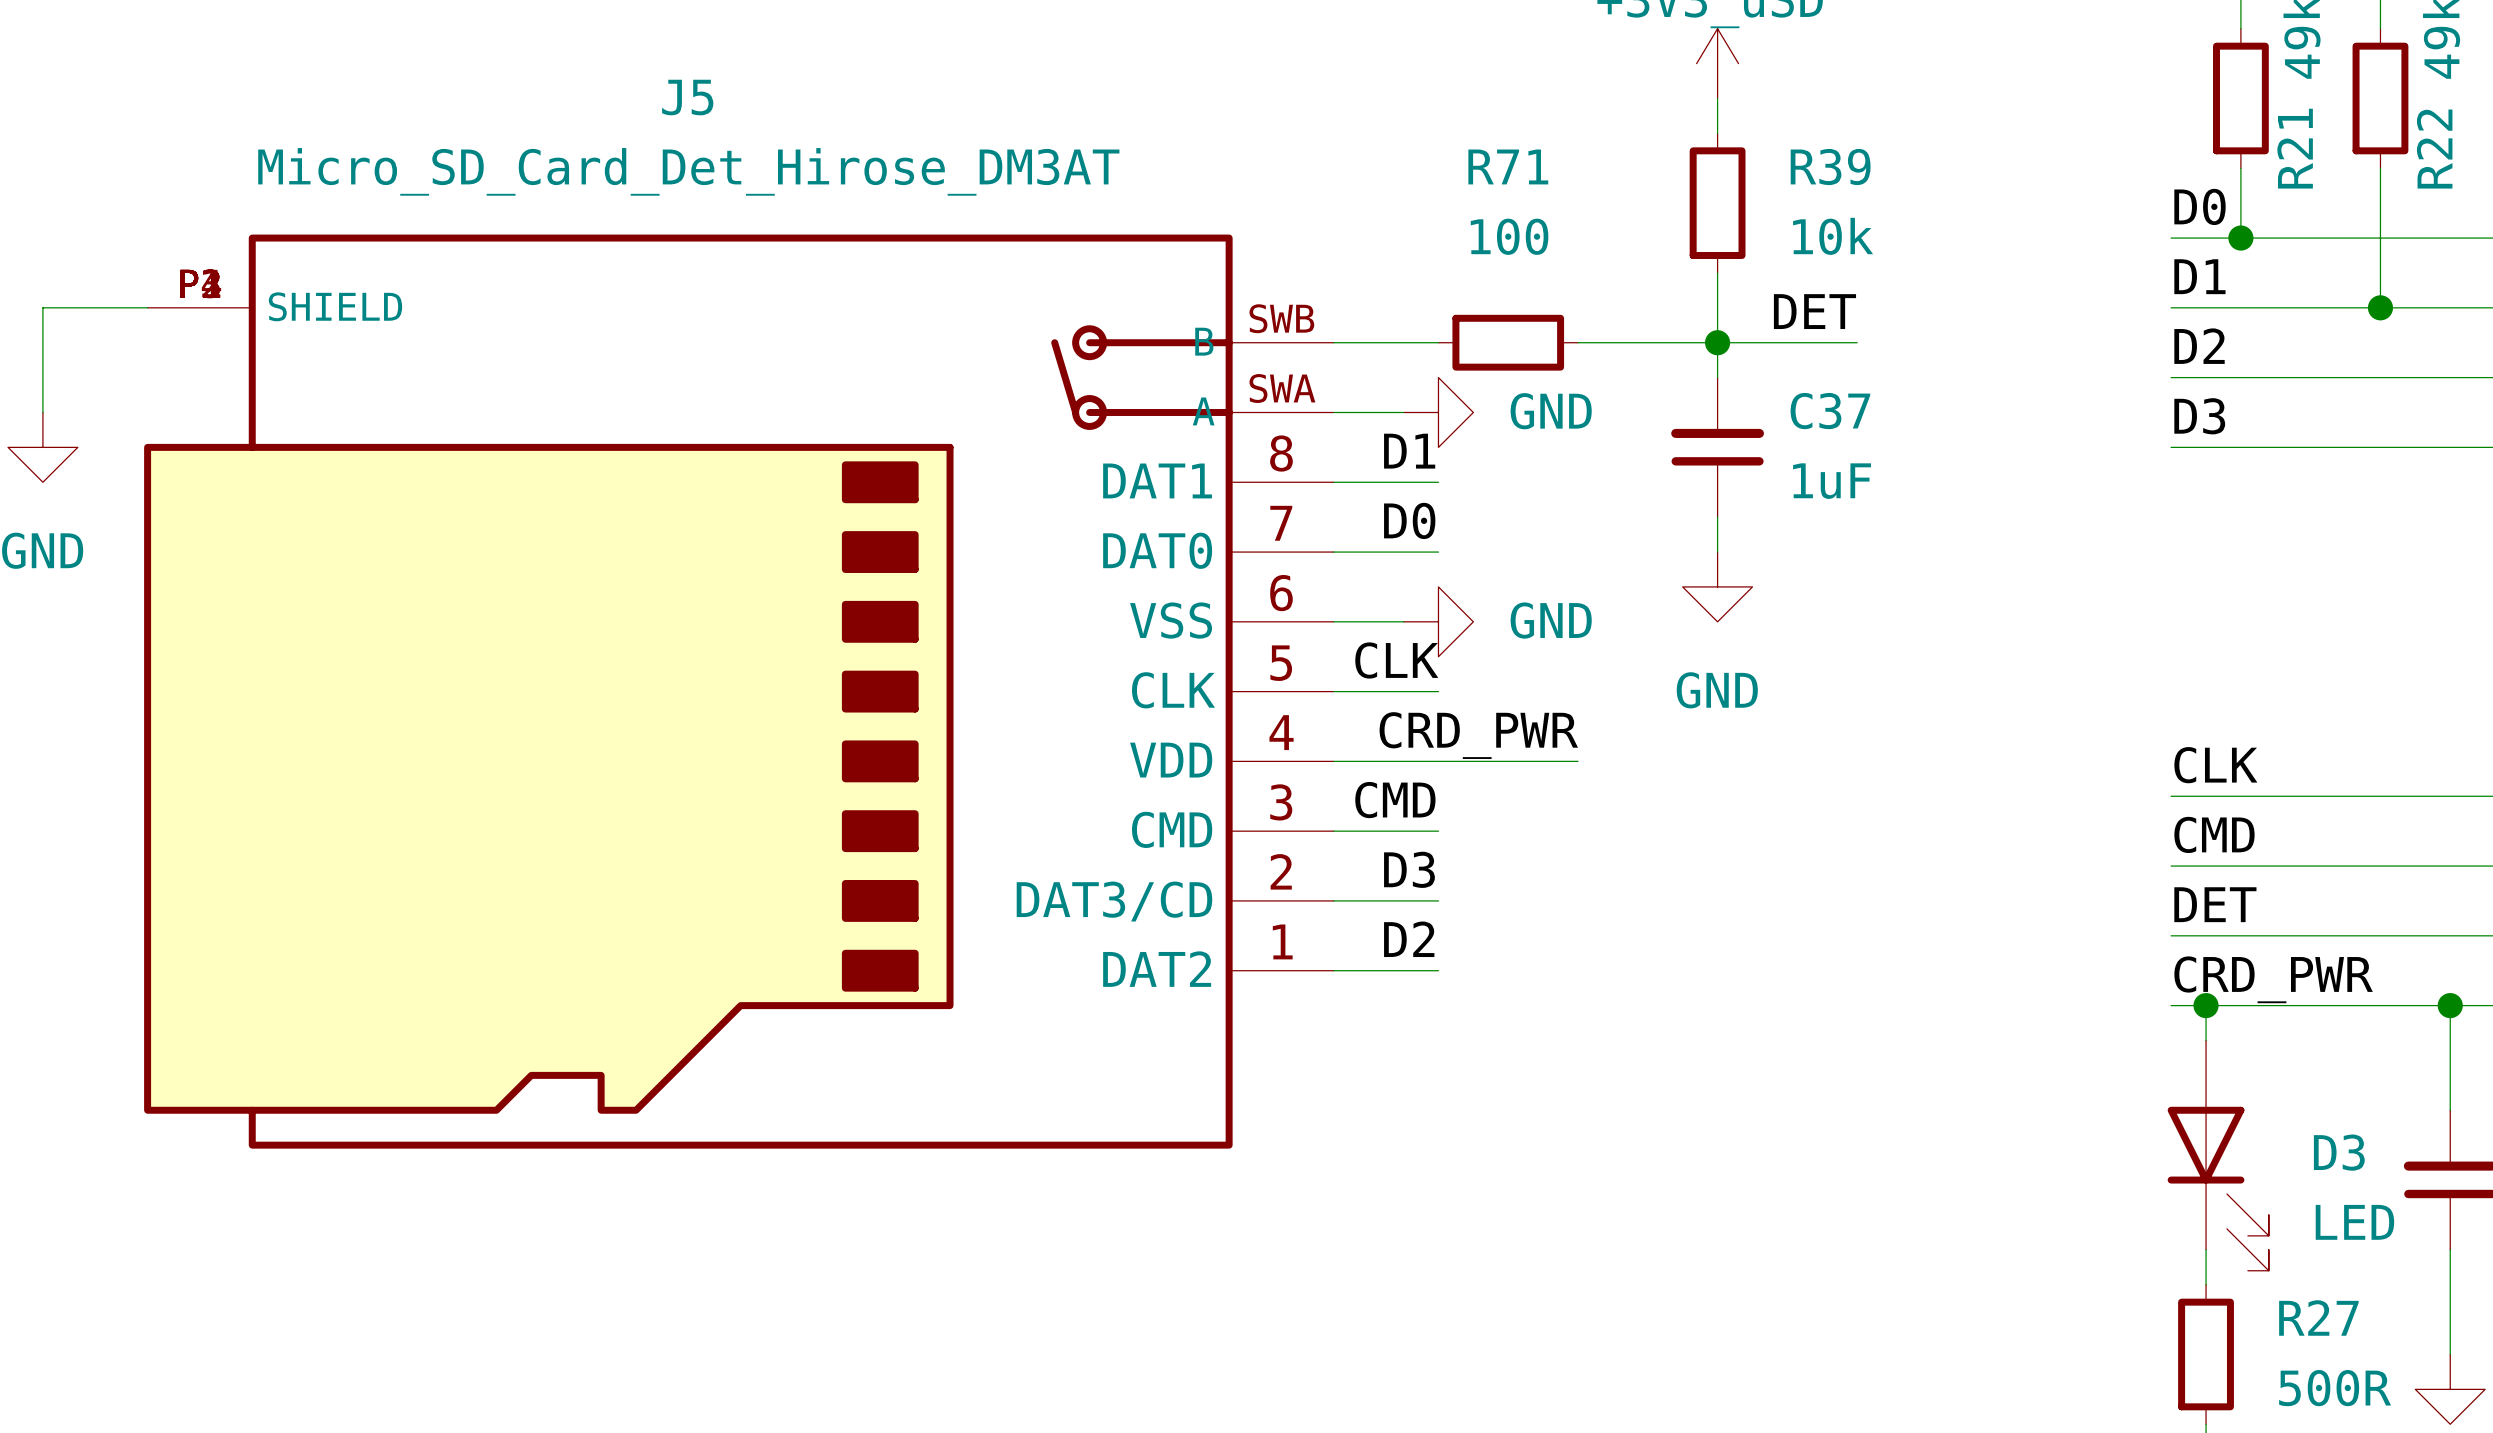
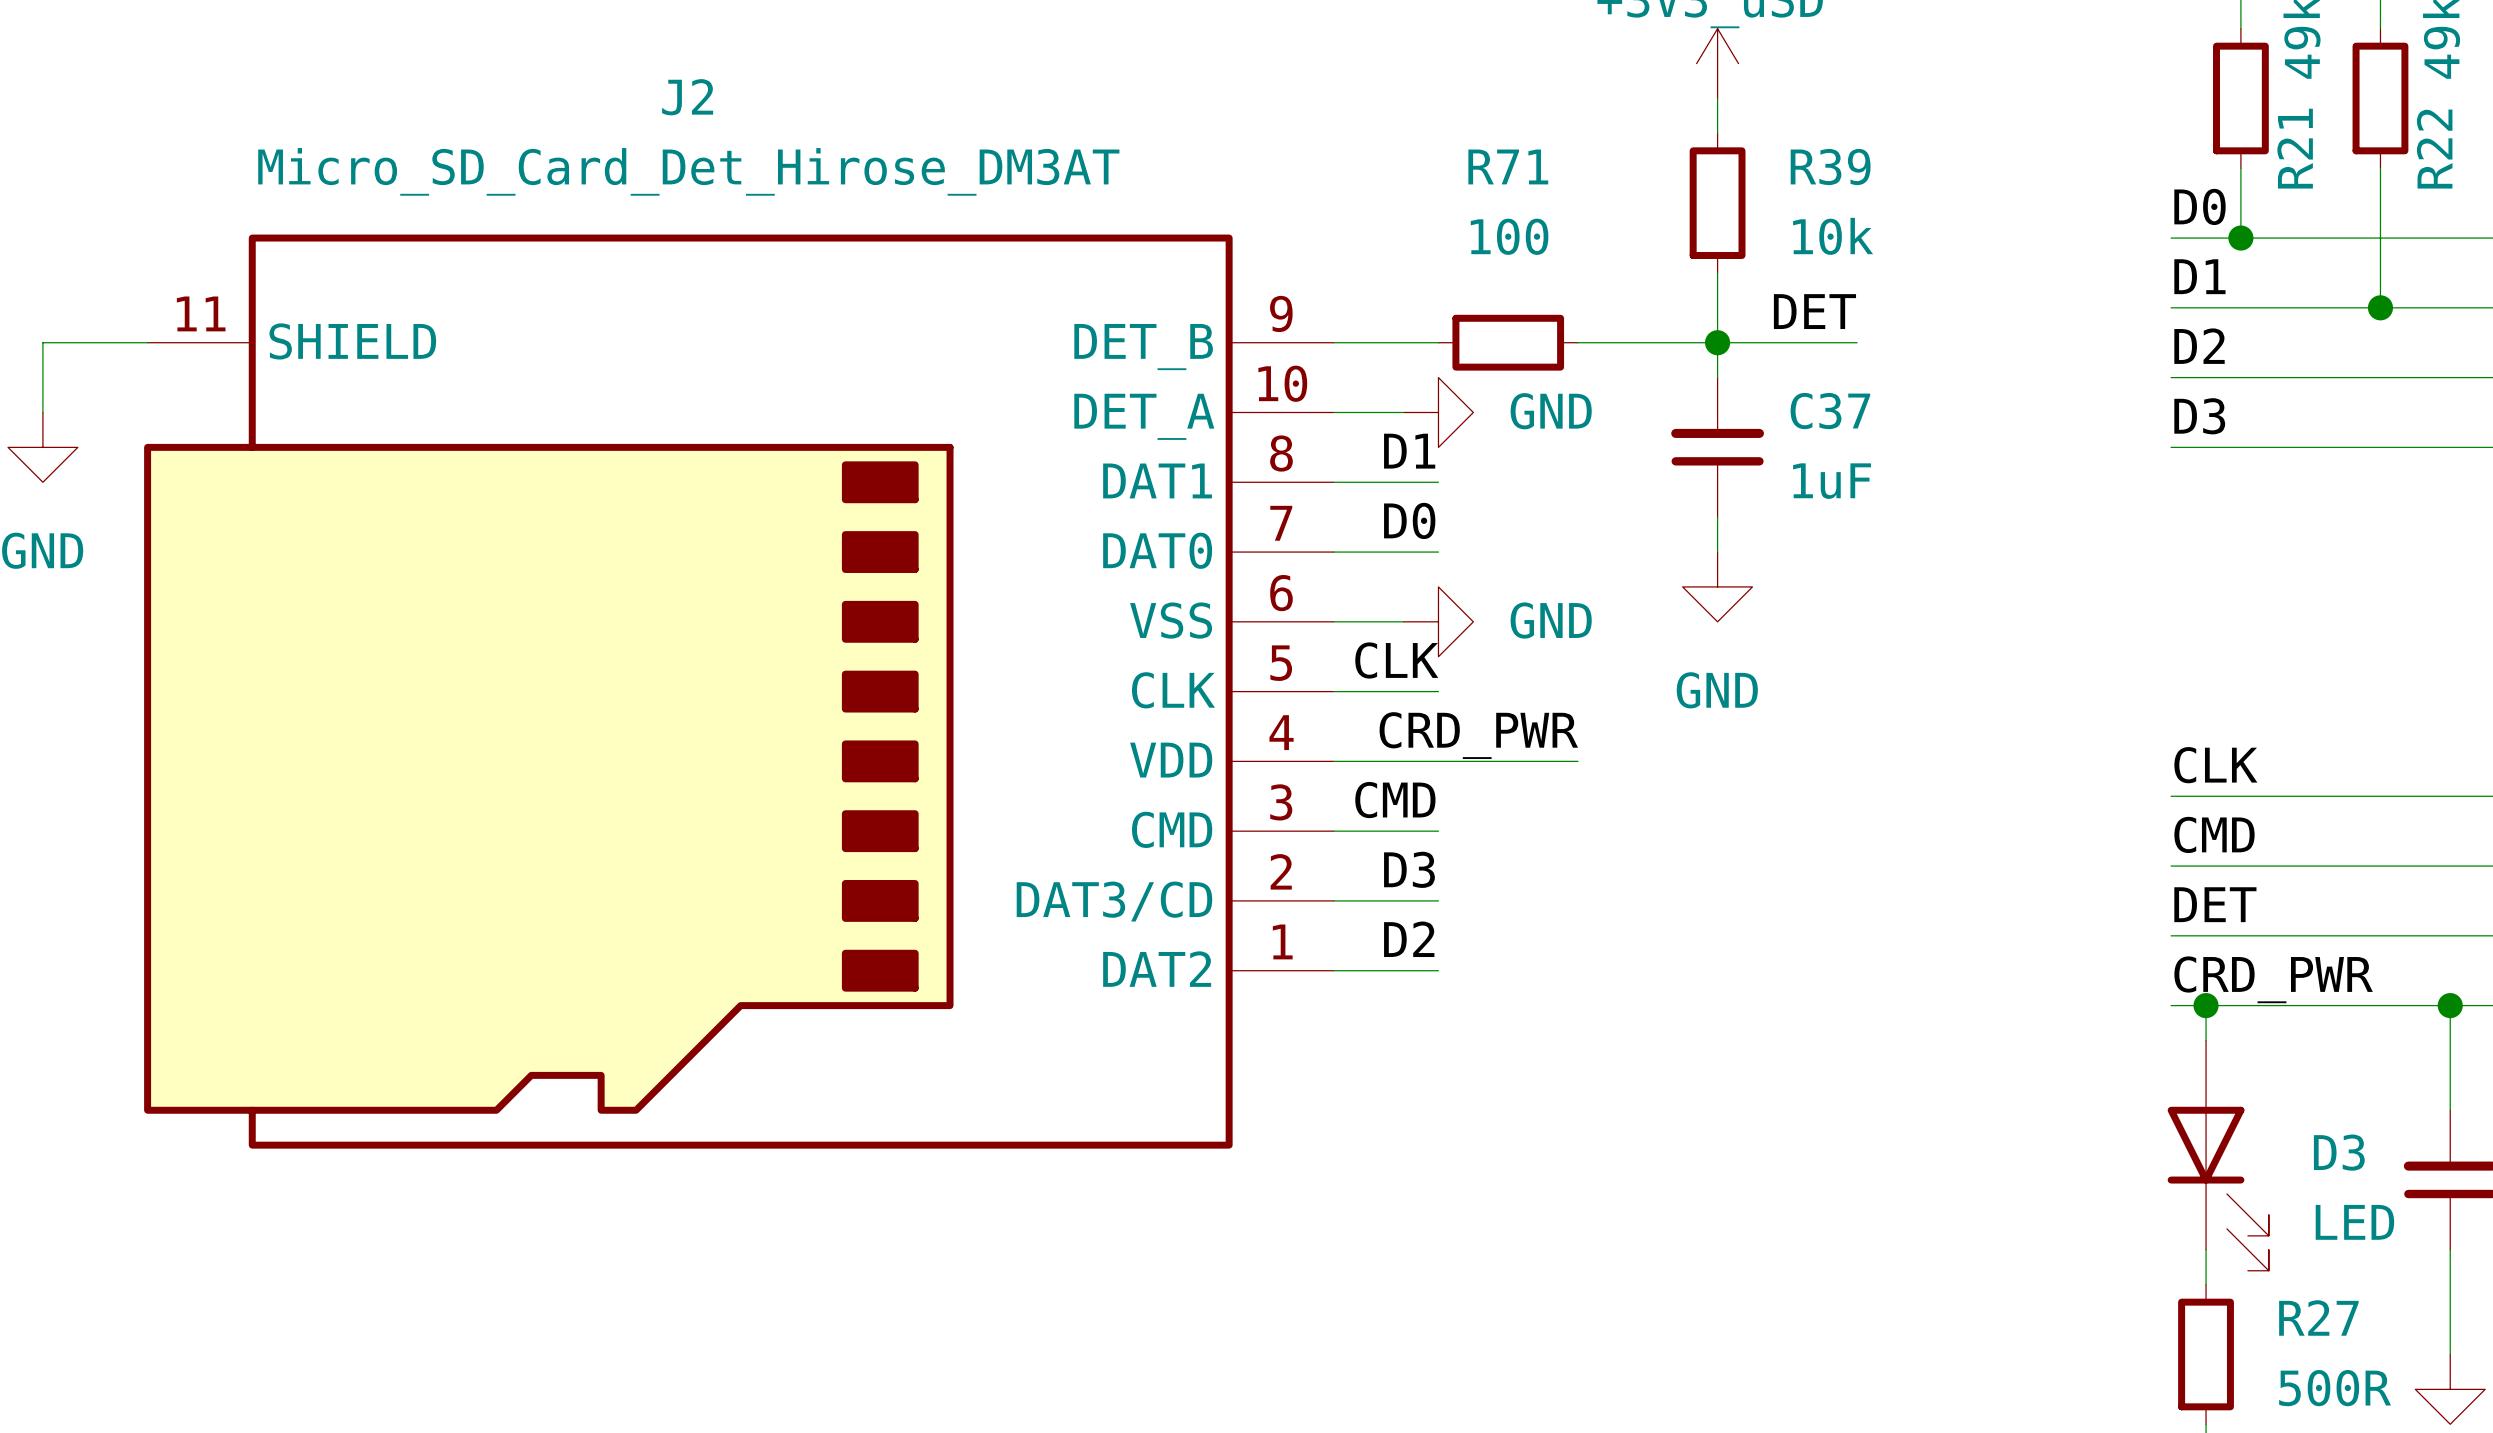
wire: (147, 307) (42, 307) (42, 342) -> (147, 342) (42, 342)
J5: Micro_SD_Card_Det_Hirose_DM3AT (738, 691) -> none
J2: none -> Micro_SD_Card_Det_Hirose_DM3AT (738, 691)

